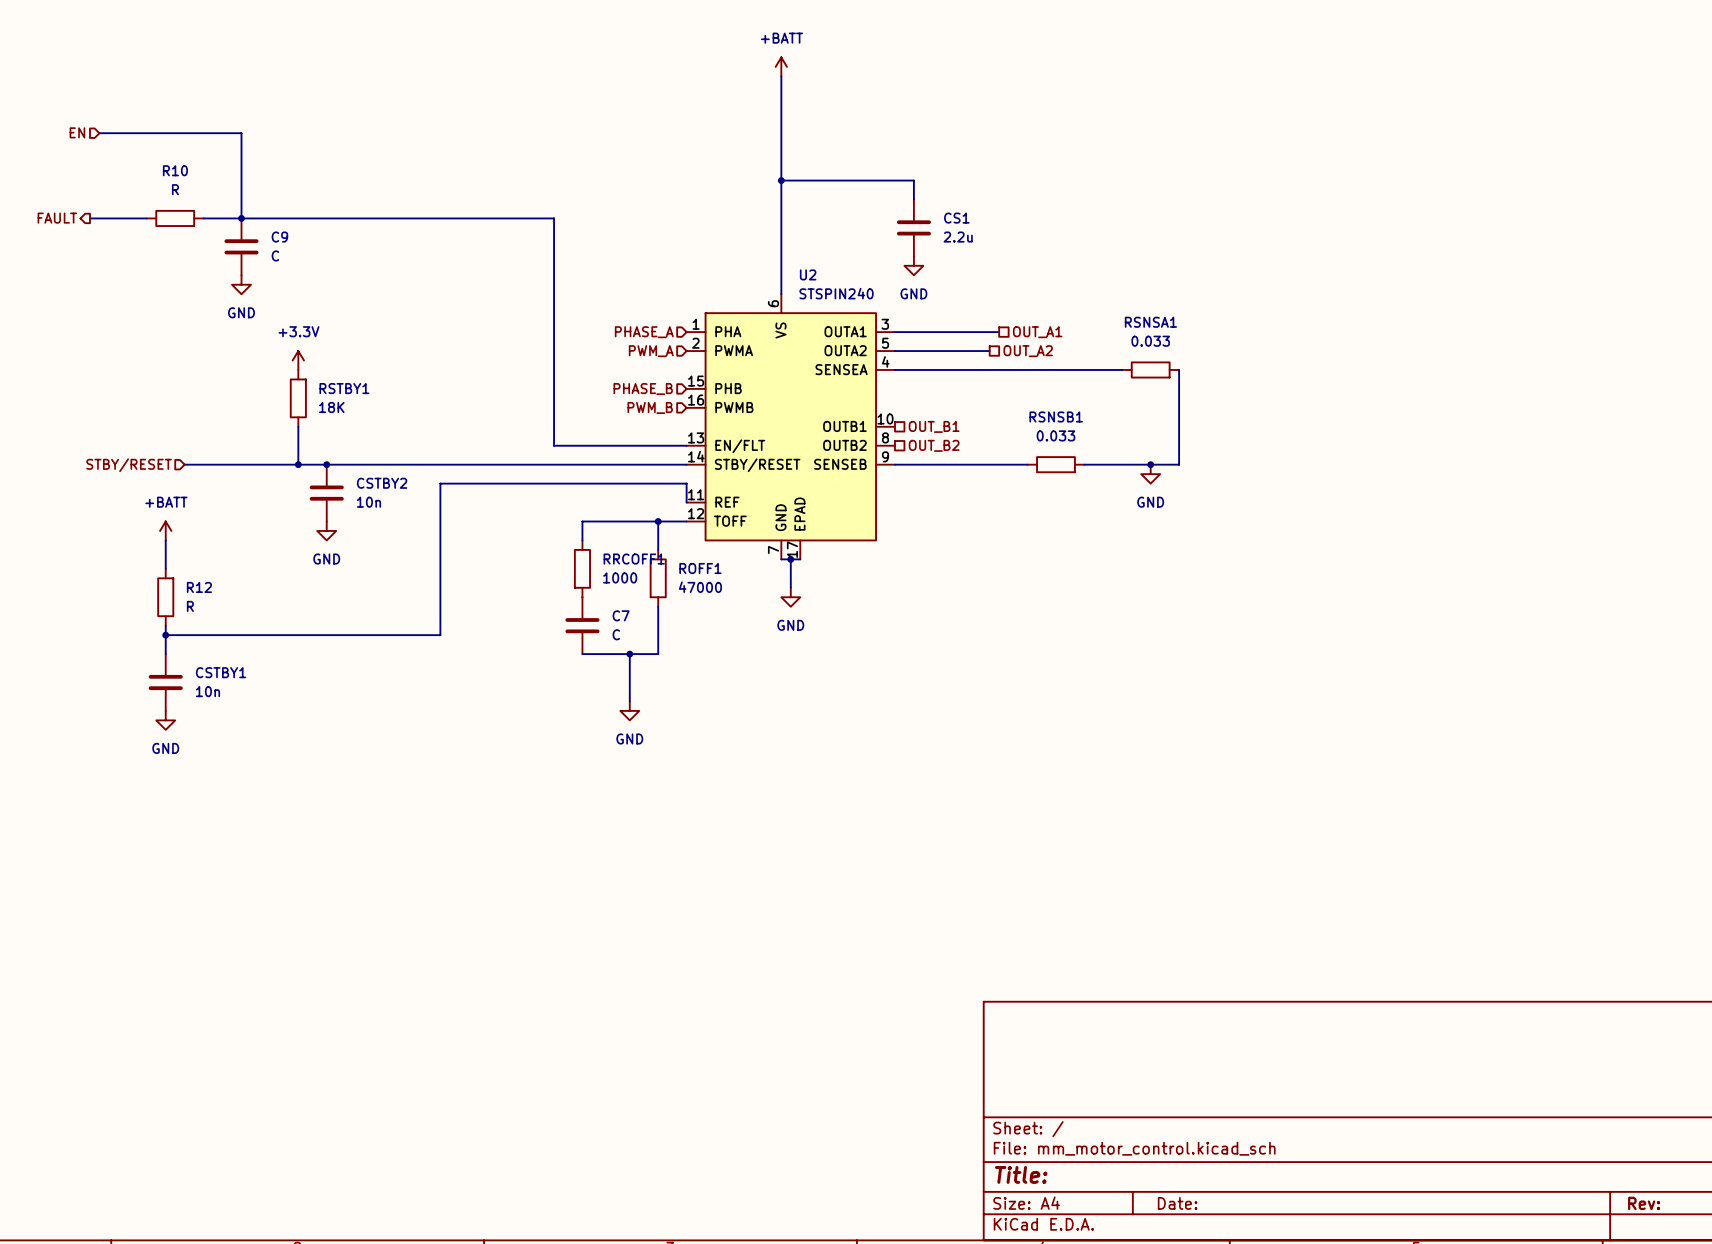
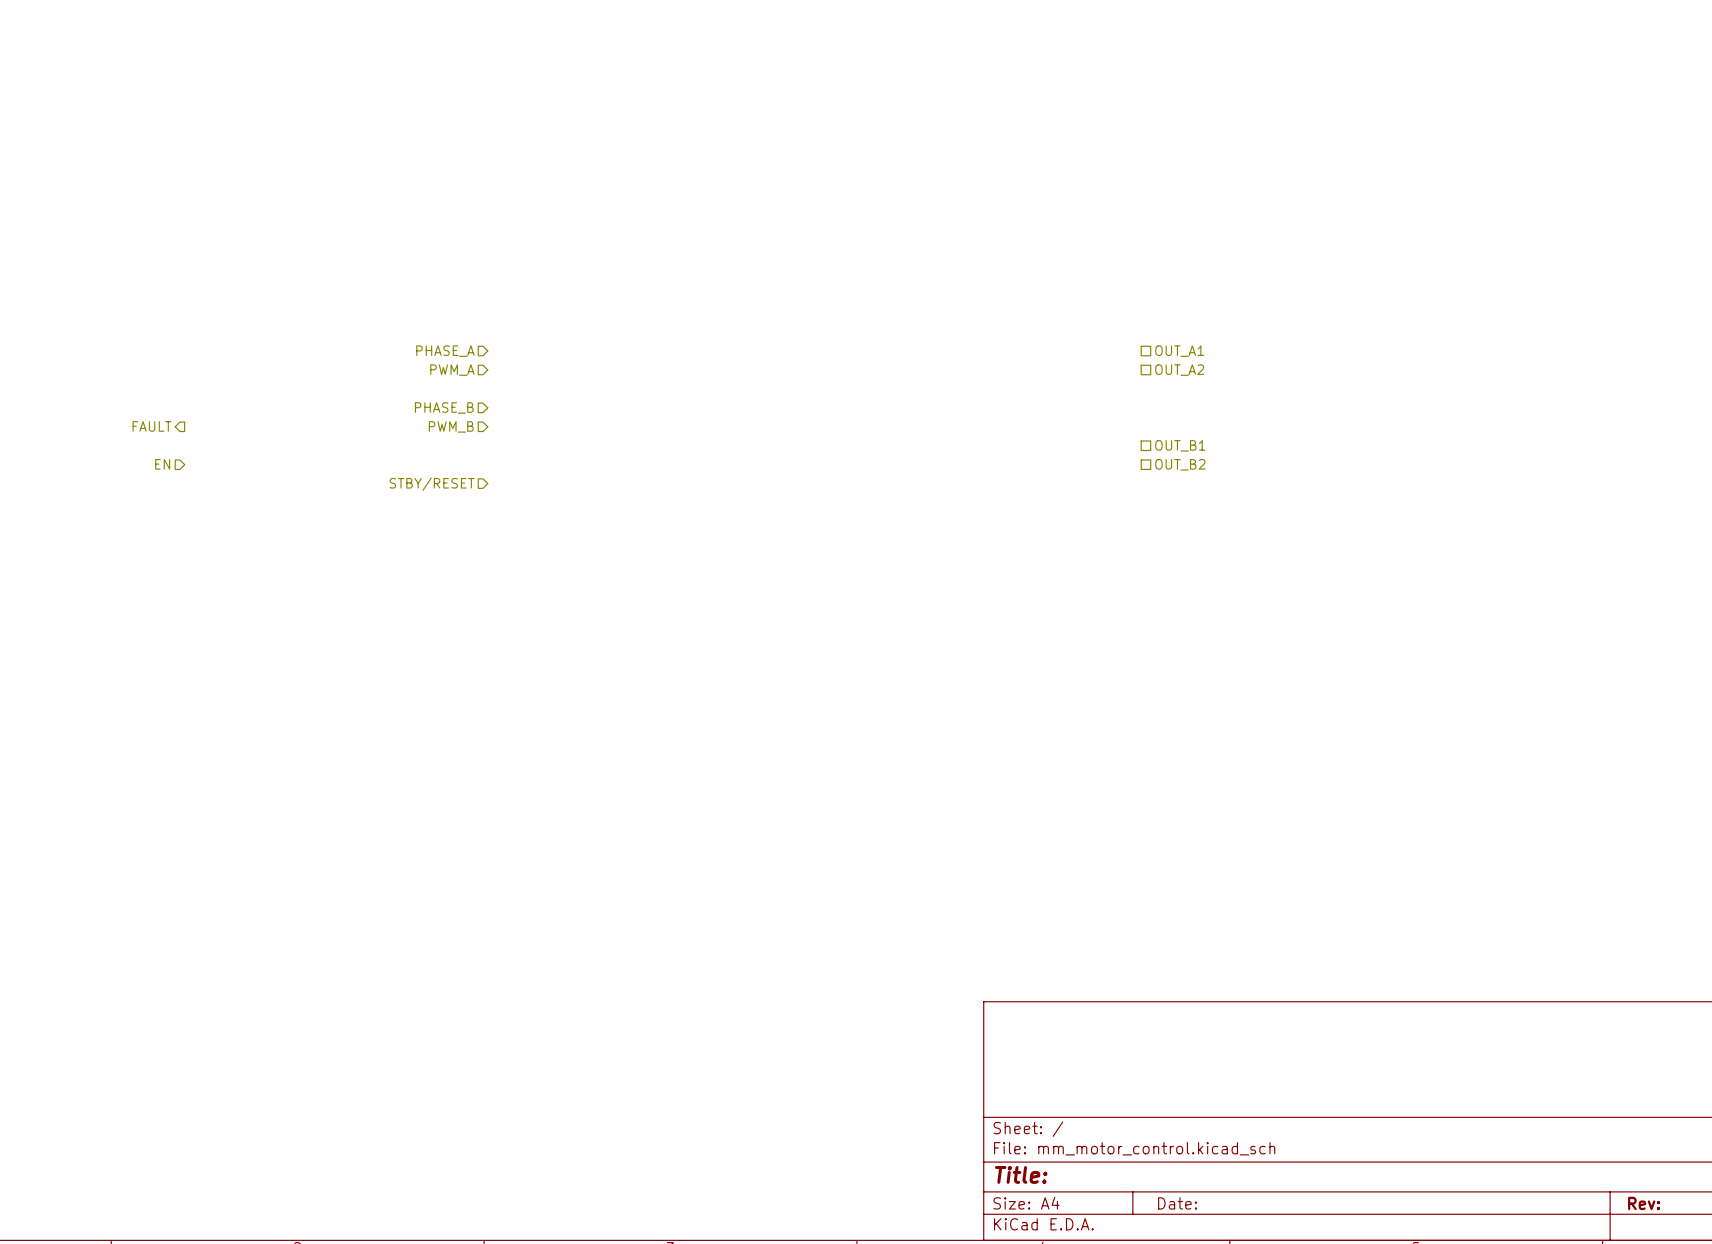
power symbol: +BATT (781, 66) -> none
wire: (781, 76) (781, 294) -> none
hierarchical label: EN (77, 132) -> none
wire: (99, 133) (241, 133) (241, 218) -> none
wire: (781, 180) (913, 180) (913, 199) -> none
junction: (781, 180) -> none
hierarchical label: FAULT (57, 218) -> none
wire: (89, 218) (146, 218) -> none
R10: R (175, 218) -> none
wire: (203, 218) (554, 218) (554, 445) (686, 445) -> none
junction: (241, 218) -> none
CS1: 2.2u (913, 227) -> none
C9: C (241, 246) -> none
power symbol: GND (913, 265) -> none
power symbol: GND (241, 284) -> none
hierarchical label: PHASE_A (644, 332) -> none
wire: (894, 332) (999, 332) -> none
hierarchical label position: OUT_A1 (1037, 332) -> OUT_A1 (1179, 351)
hierarchical label: none -> PHASE_A (445, 351)
hierarchical label: PWM_A (651, 351) -> none
wire: (894, 351) (989, 351) -> none
hierarchical label position: OUT_A2 (1028, 351) -> OUT_A2 (1179, 370)
power symbol: +3.3V (298, 360) -> none
wire: (894, 369) (1122, 369) -> none
RSNSA1: 0.033 (1150, 369) -> none
wire: (1179, 369) (1179, 464) (1084, 464) -> none
hierarchical label: none -> PWM_A (452, 370)
hierarchical label: PHASE_B (643, 389) -> none
RSTBY1: 18K (298, 398) -> none
hierarchical label: none -> PHASE_B (444, 407)
hierarchical label: PWM_B (650, 407) -> none
hierarchical label: none -> FAULT (152, 426)
wire: (298, 426) (298, 464) -> none
hierarchical label: none -> PWM_B (451, 426)
U2: STSPIN240 (790, 426) -> none
hierarchical label: OUT_B1 (934, 426) -> none
hierarchical label: OUT_B2 (934, 445) -> none
hierarchical label: none -> OUT_B1 (1180, 445)
wire: (184, 464) (686, 464) -> none
junction: (298, 464) -> none
junction: (326, 464) -> none
wire: (894, 464) (1027, 464) -> none
RSNSB1: 0.033 (1055, 464) -> none
junction: (1150, 464) -> none
hierarchical label: none -> OUT_B2 (1180, 464)
hierarchical label: STBY/RESET (129, 465) -> EN (162, 464)
power symbol: GND (1150, 474) -> none
hierarchical label: none -> STBY/RESET (432, 484)
CSTBY2: 10n (326, 493) -> none
wire: (686, 502) (686, 483) (440, 483) (440, 635) (165, 635) -> none
wire: (658, 521) (658, 549) -> none
junction: (658, 521) -> none
wire: (686, 521) (582, 521) (582, 540) -> none
power symbol: +BATT (165, 530) -> none
power symbol: GND (326, 530) -> none
wire: (165, 540) (165, 568) -> none
wire: (781, 559) (800, 559) -> none
wire: (790, 559) (790, 587) -> none
junction: (790, 559) -> none
RRCOFF1: 1000 (582, 568) -> none
ROFF1: 47000 (658, 578) -> none
R12: R (165, 597) -> none
power symbol: GND (790, 597) -> none
wire: (658, 606) (658, 654) (582, 654) -> none
wire: (165, 625) (165, 654) -> none
C7: C (582, 625) -> none
junction: (165, 635) -> none
wire: (629, 654) (629, 701) -> none
junction: (629, 654) -> none
CSTBY1: 10n (165, 682) -> none
power symbol: GND (629, 710) -> none
power symbol: GND (165, 720) -> none

